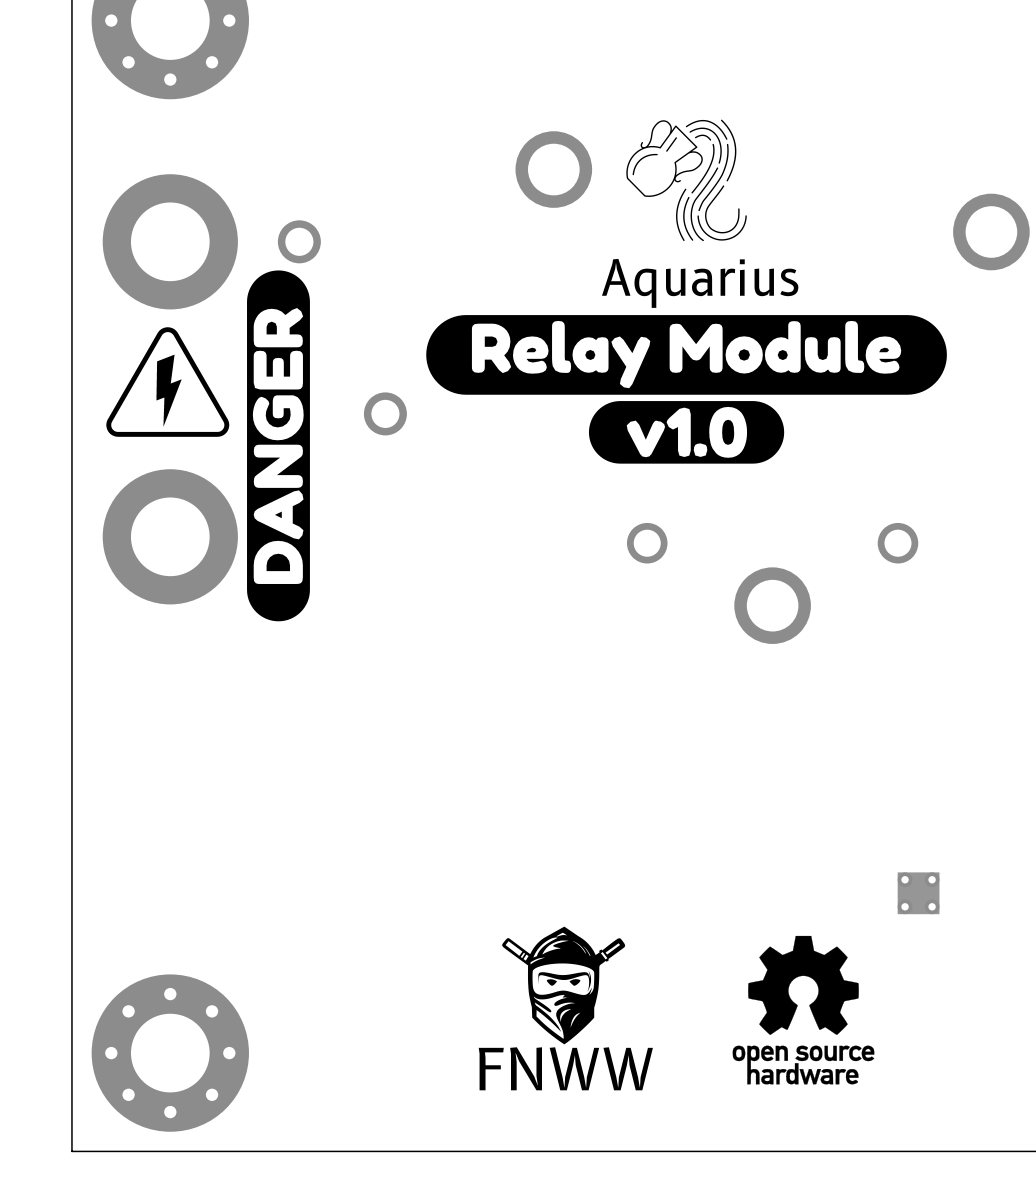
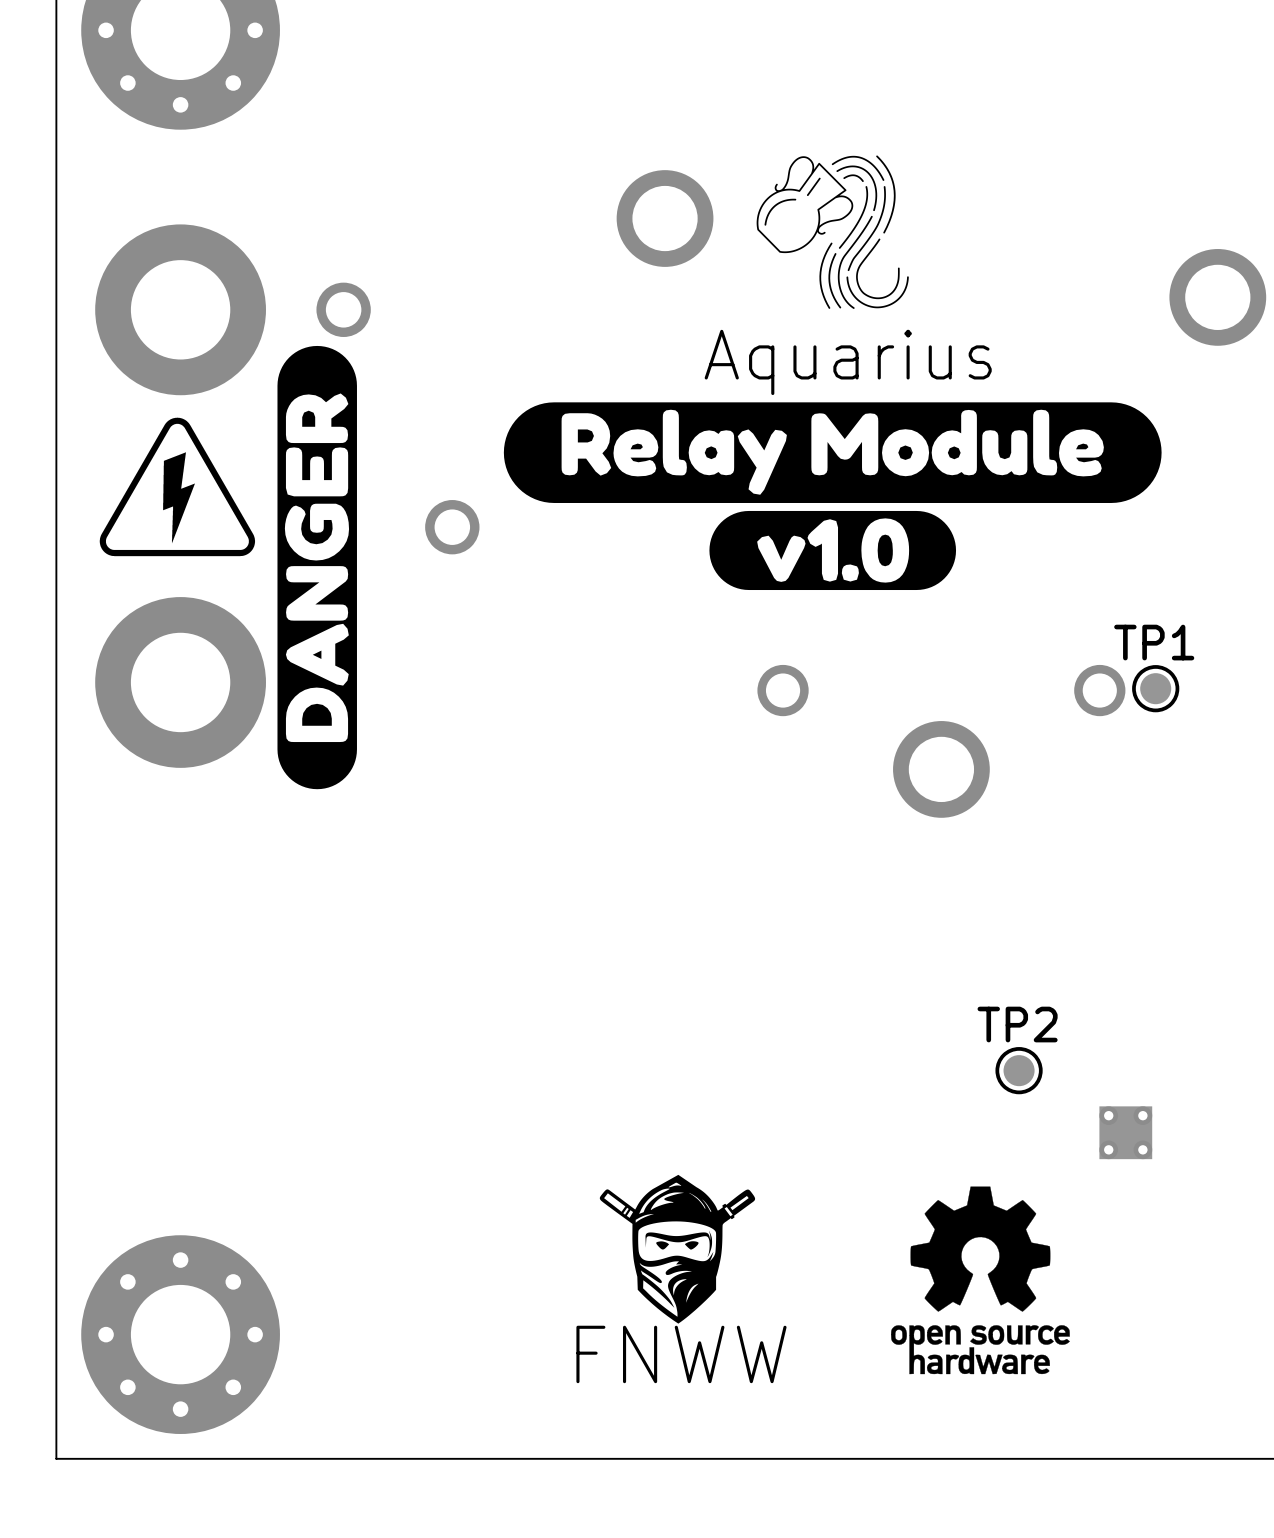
TP1: none -> (1155, 688)
TP2: none -> (1019, 1070)

